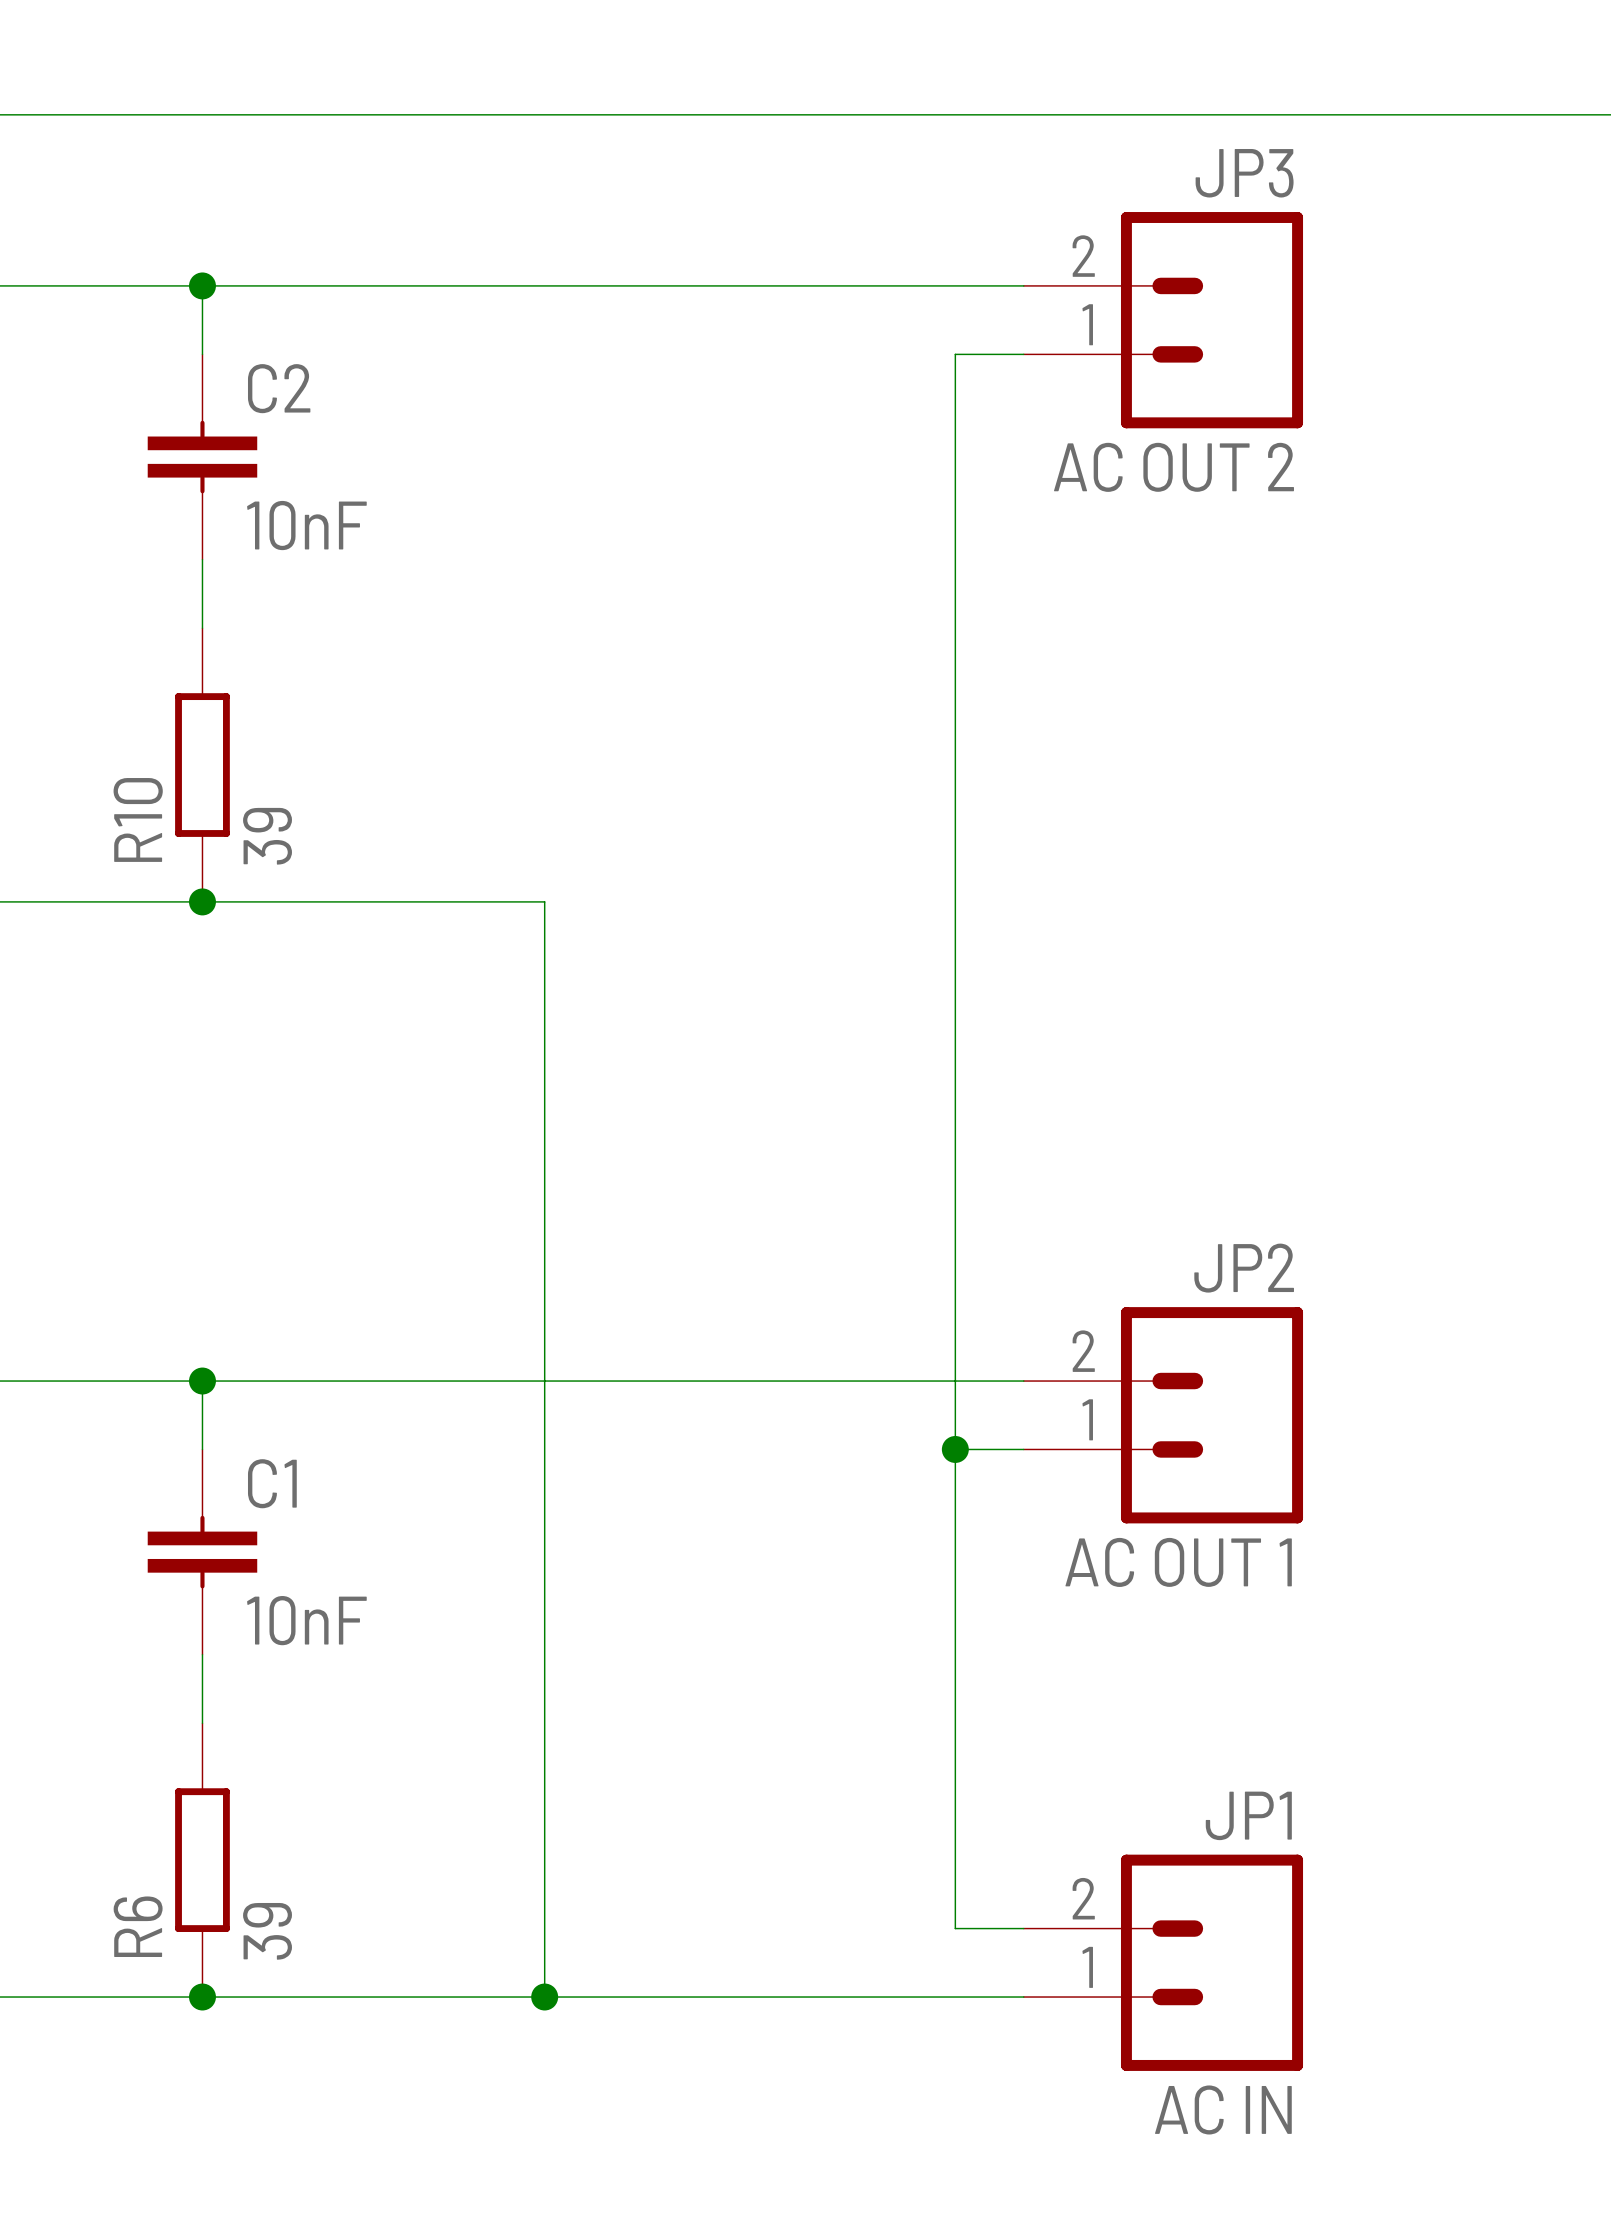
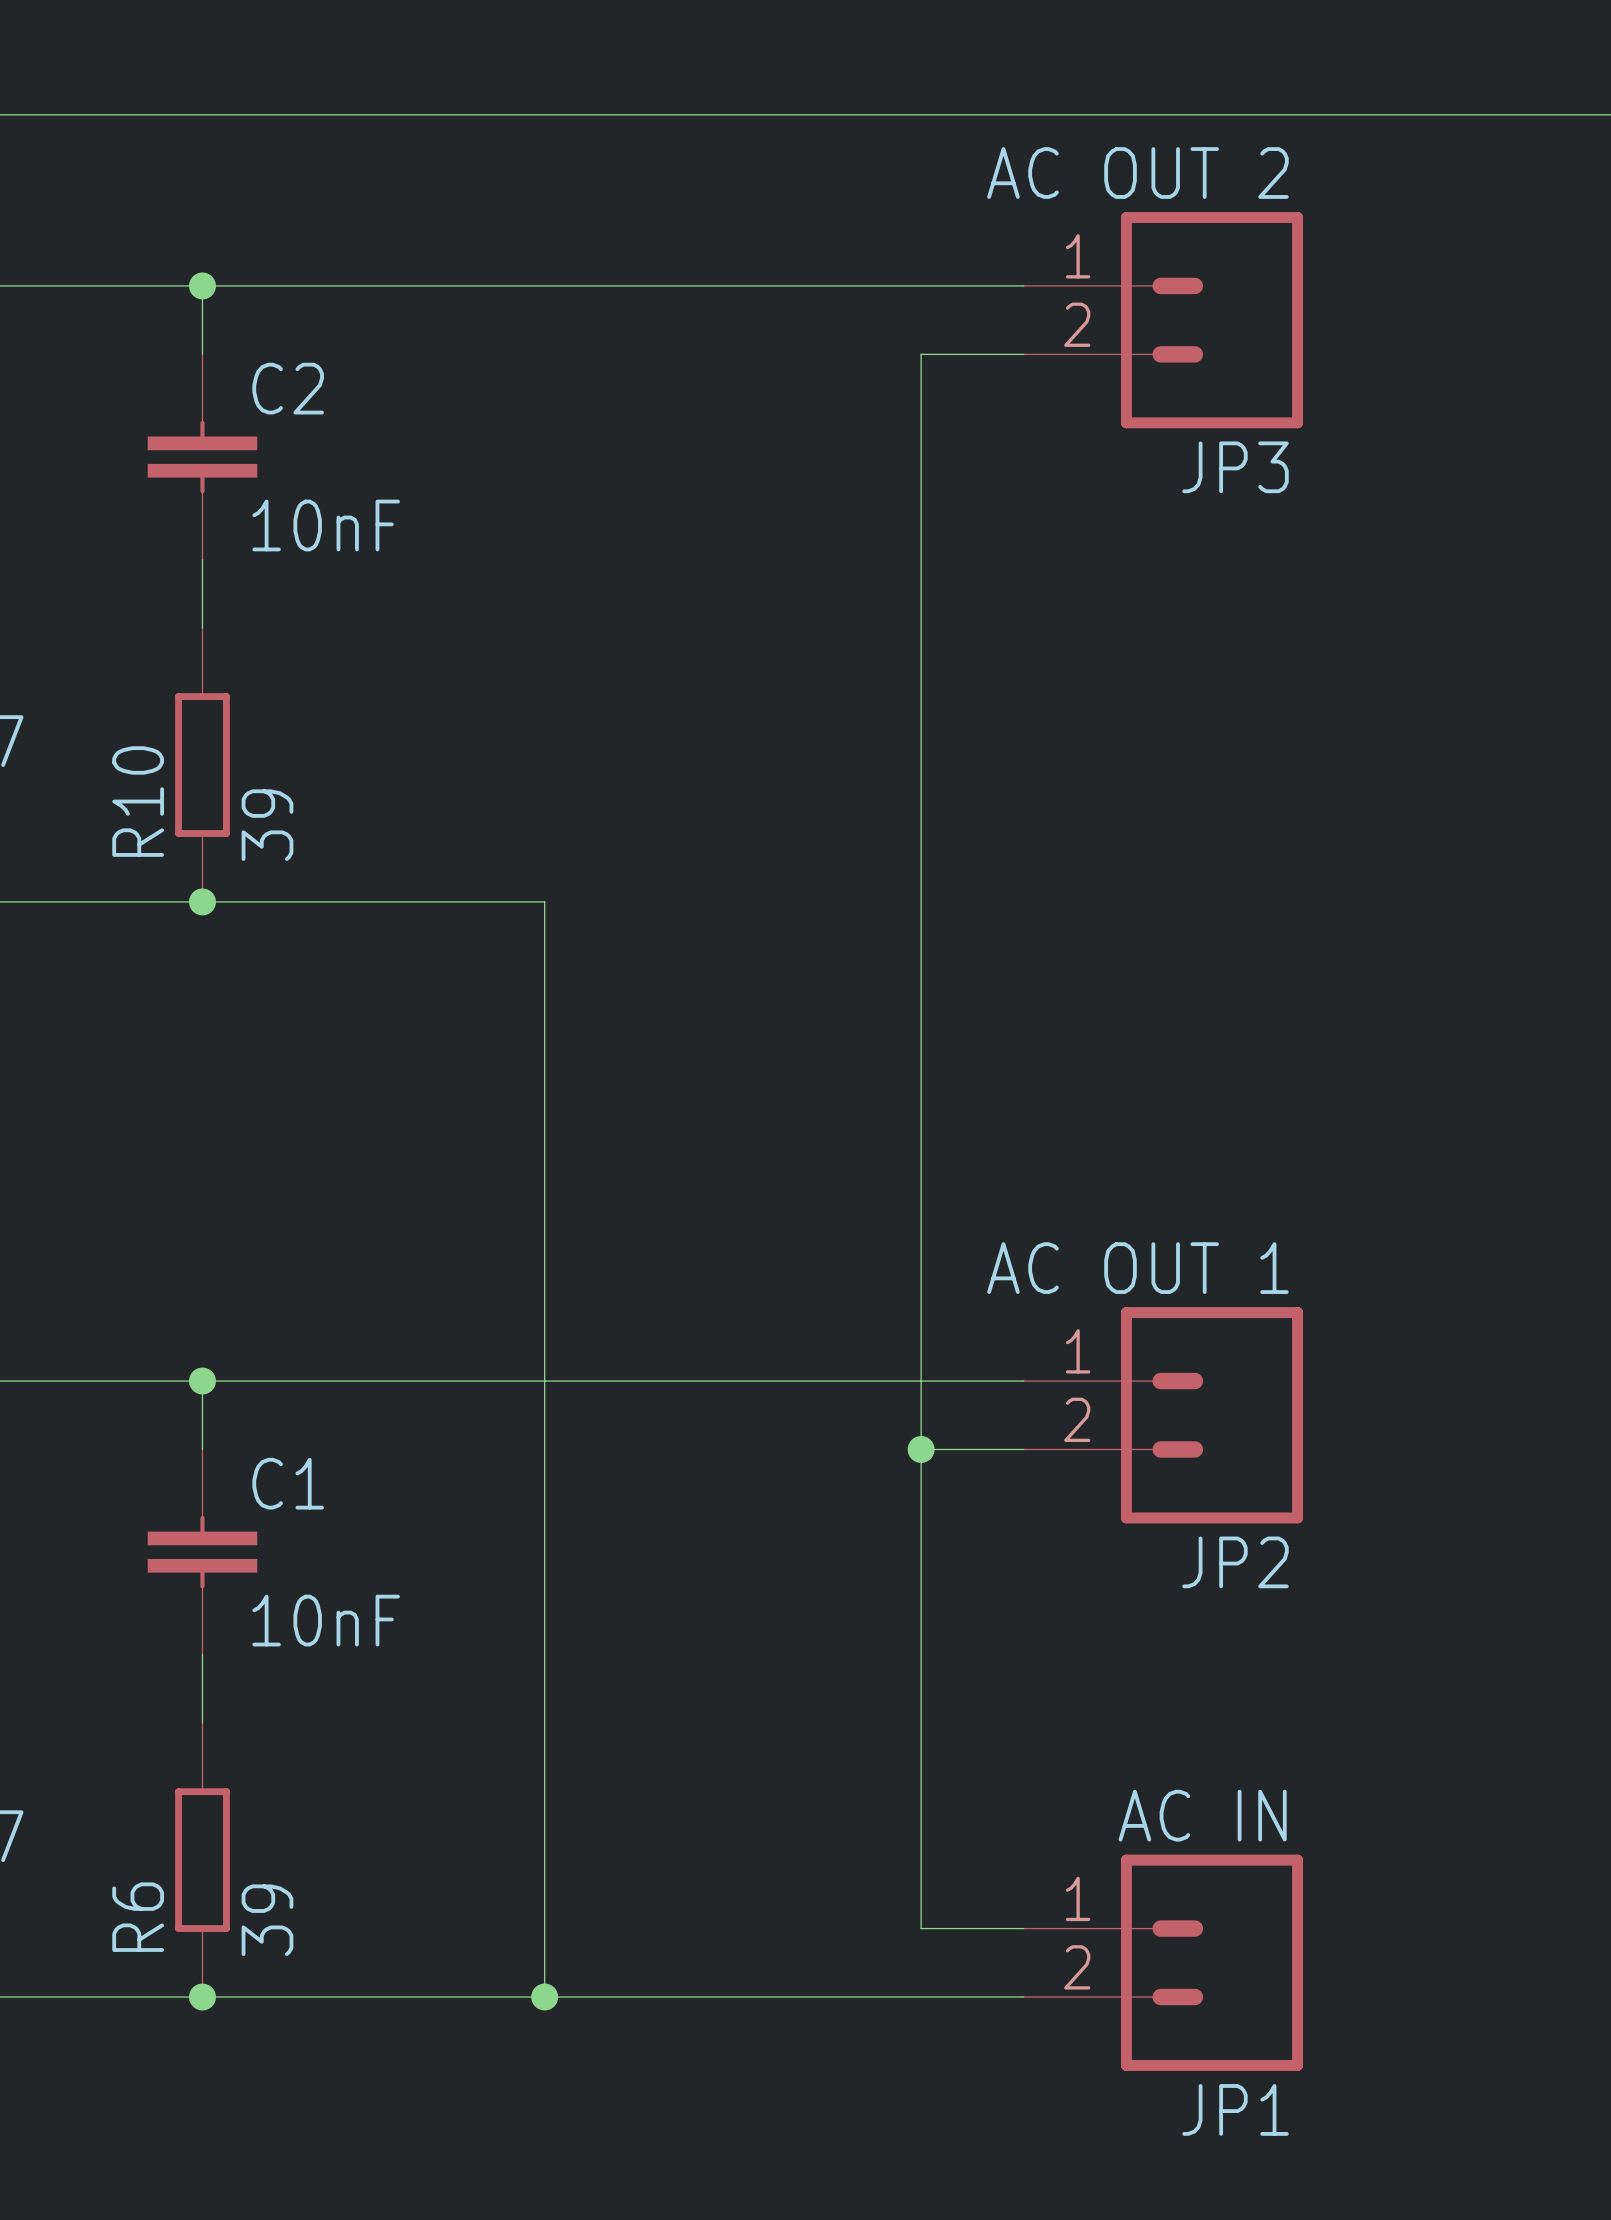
JP3 flip: as is (1212, 320) -> up-down (1212, 320)
wire: (955, 354) (955, 1928) -> (955, 354) (921, 354) (921, 1928) (955, 1928)
JP2 flip: as is (1212, 1415) -> up-down (1212, 1415)
wire: none -> (921, 1449) (955, 1449)
junction position: (955, 1449) -> (921, 1449)
JP1 flip: as is (1212, 1962) -> up-down (1212, 1962)

